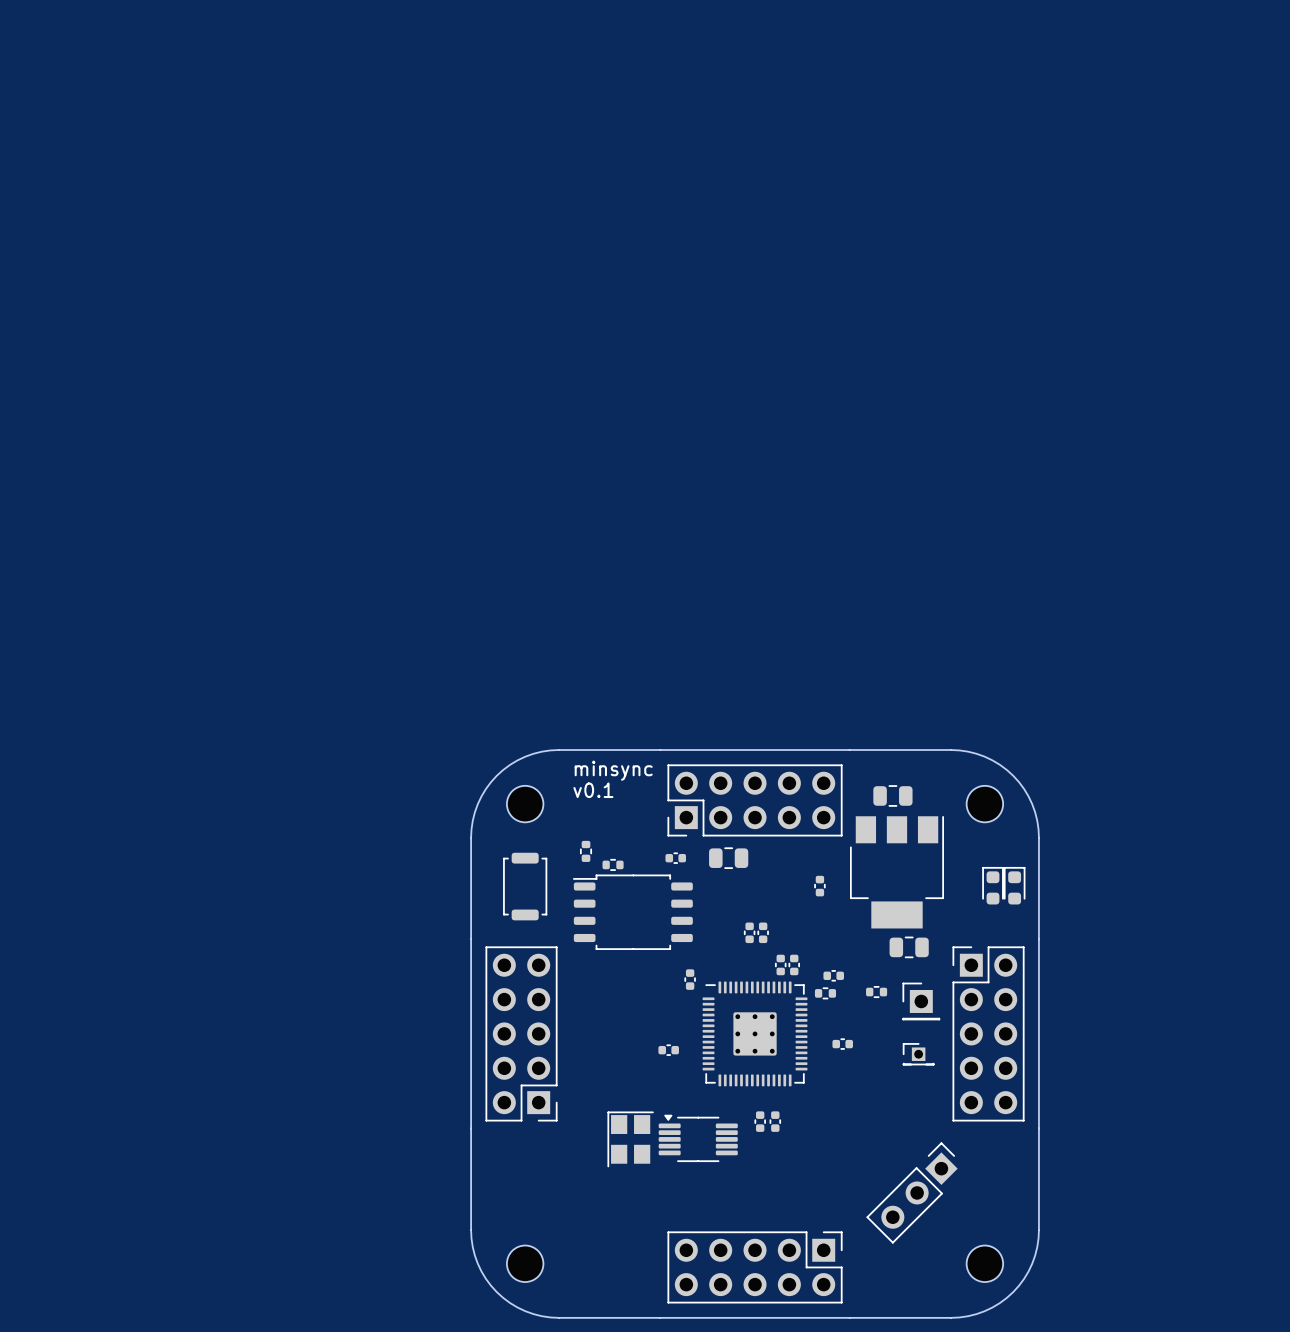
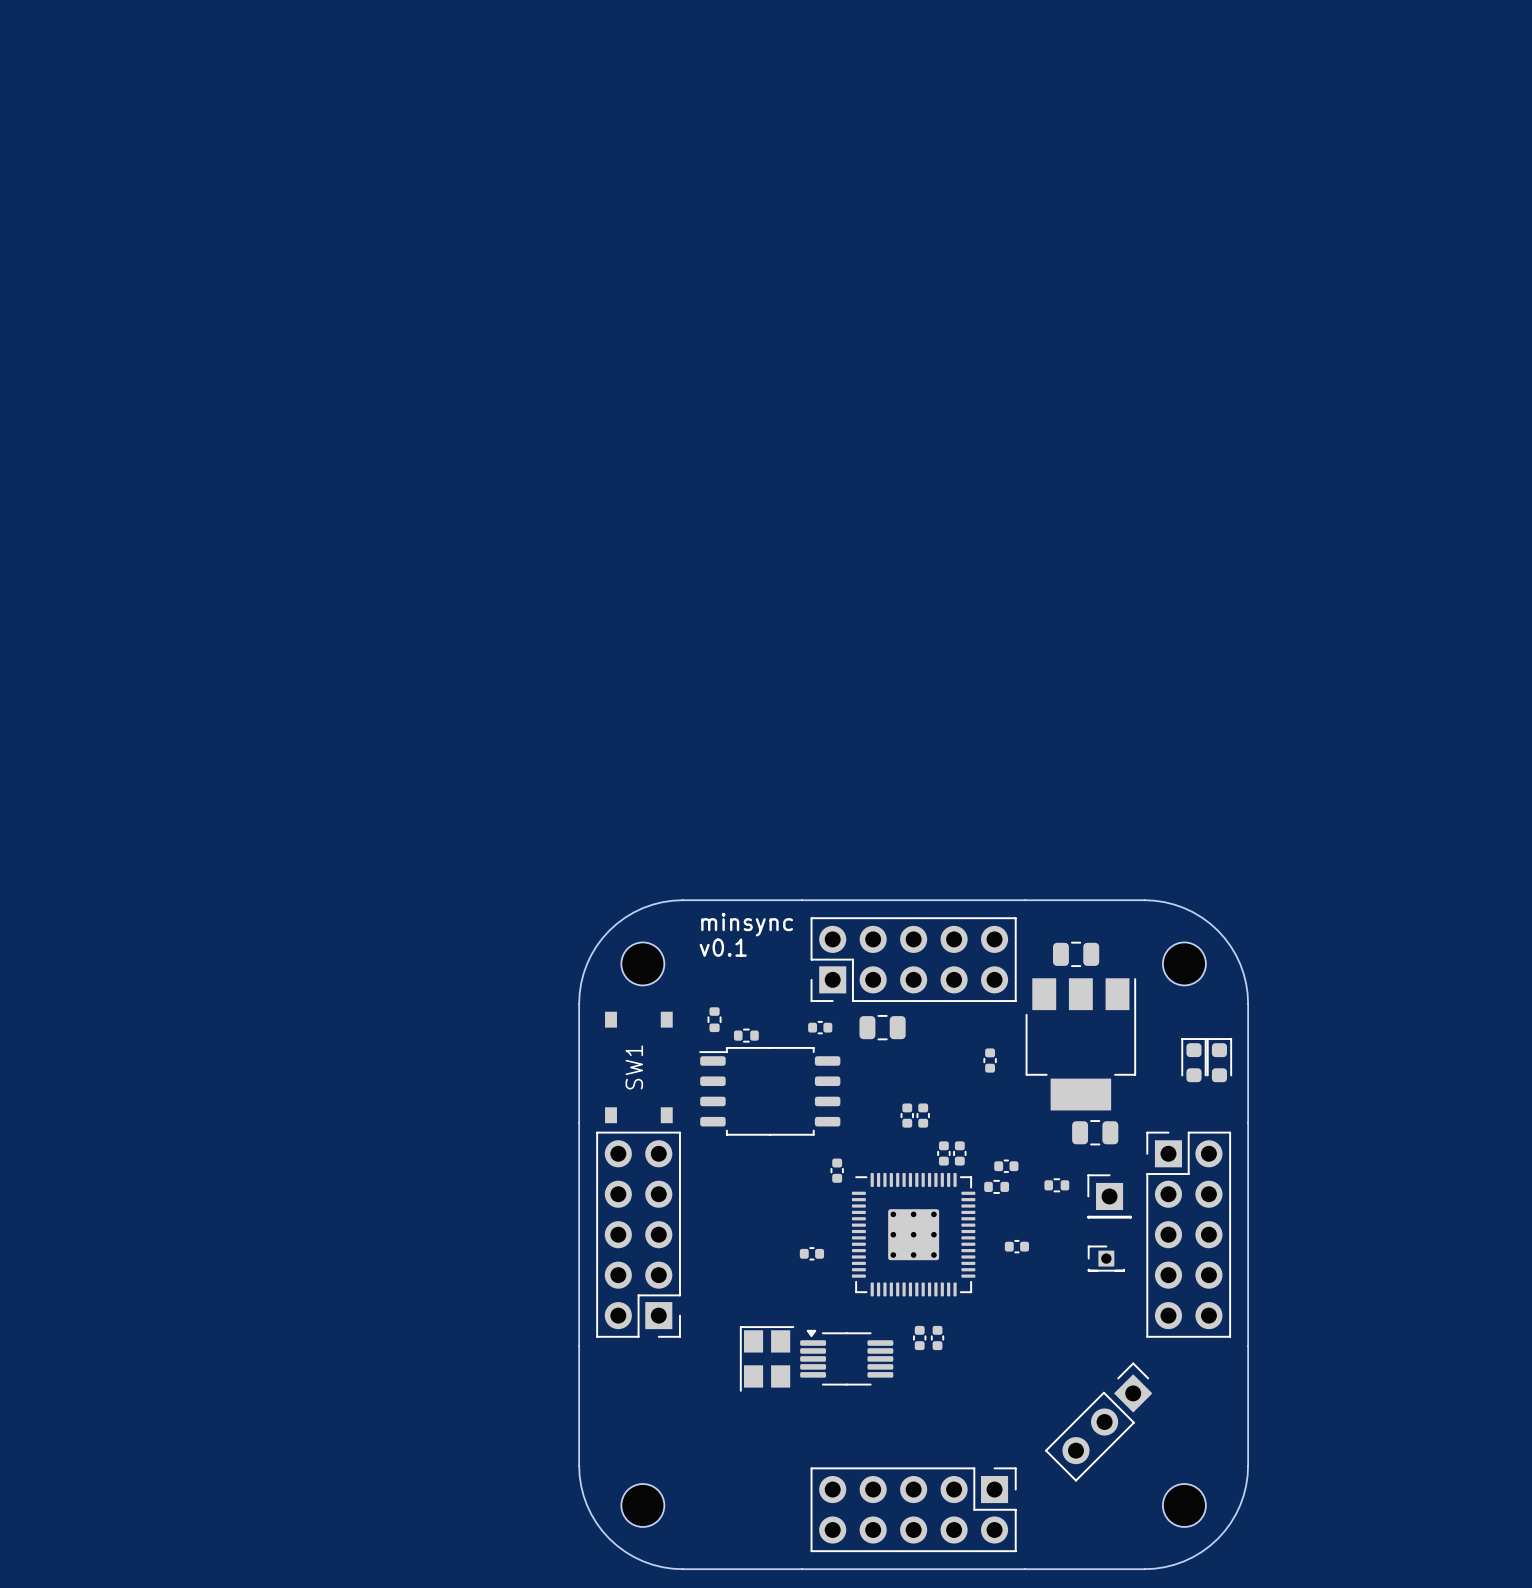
part: (525, 886) -> none
SW1: none -> (638, 1067)

